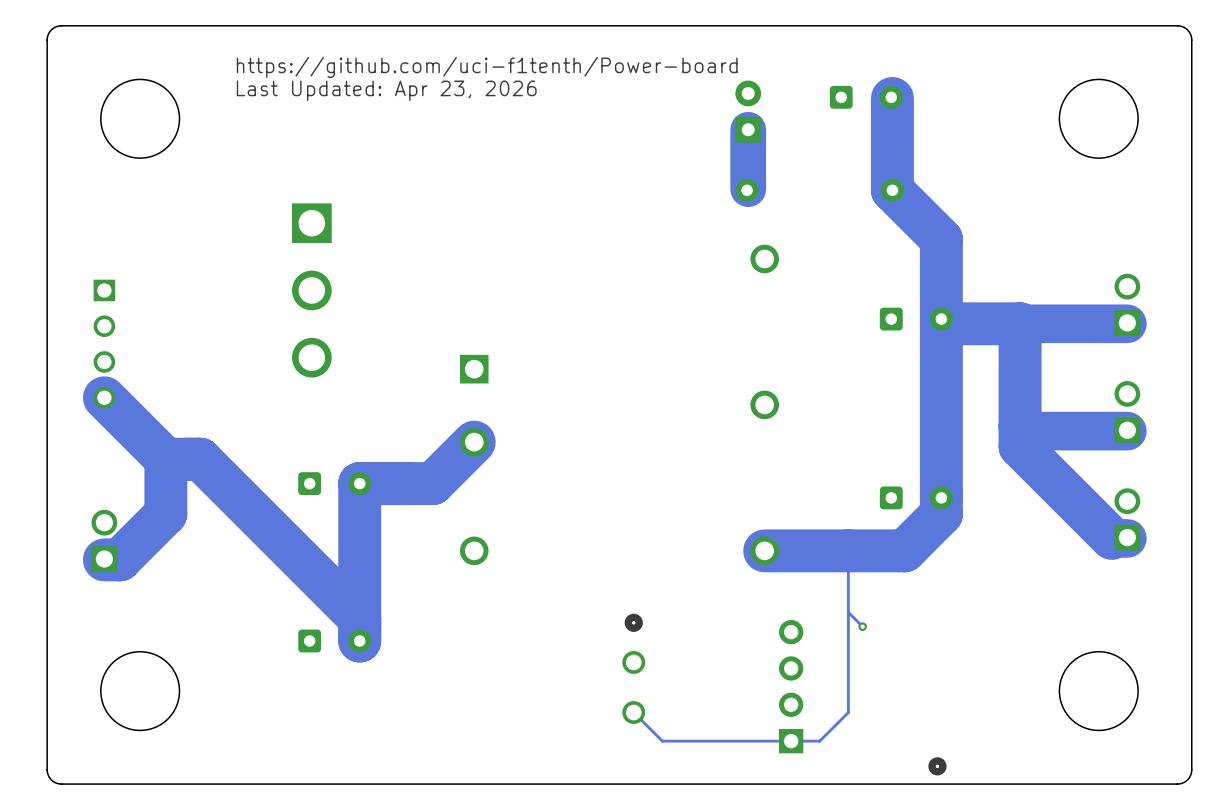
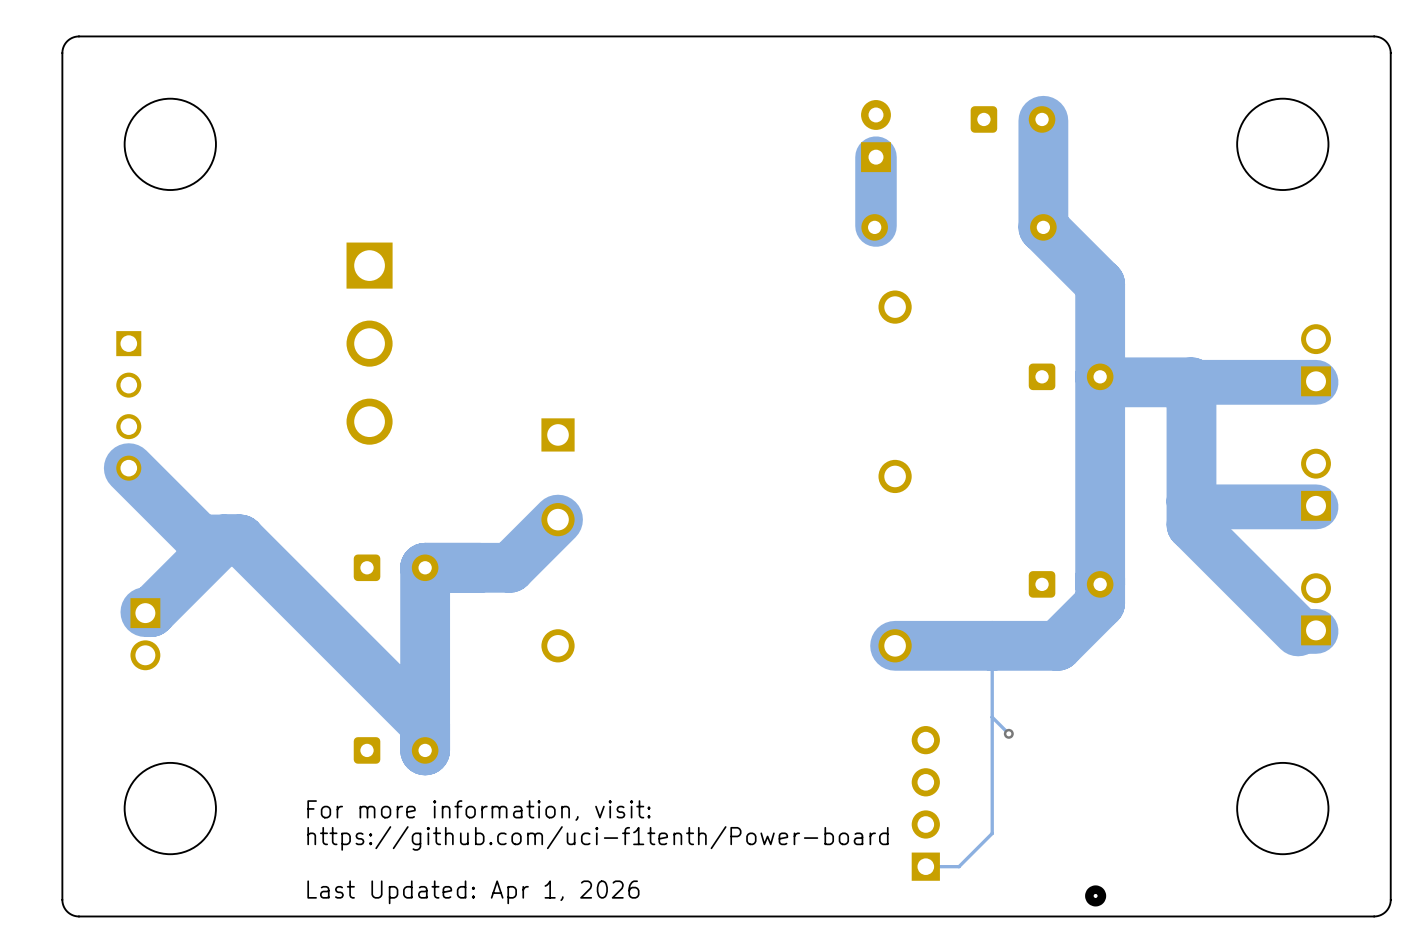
text: https://github.com/uci-f1tenth/Power-board (487, 67) -> none
text: Last Updated: Apr 23, 2026 (386, 90) -> none
track: (165, 459) (165, 513) (119, 559) (104, 559) -> none
track: none -> (223, 539) (150, 612) (145, 612)
part rotation: 0° (104, 540) -> 180° (145, 634)
part: (633, 668) -> none
text: none -> For more information, visit: (478, 810)
track: (633, 712) (662, 741) (791, 741) -> none
text: none -> https://github.com/uci-f1tenth/Power-board (597, 838)
text: none -> Last Updated: Apr 1, 2026 (473, 892)

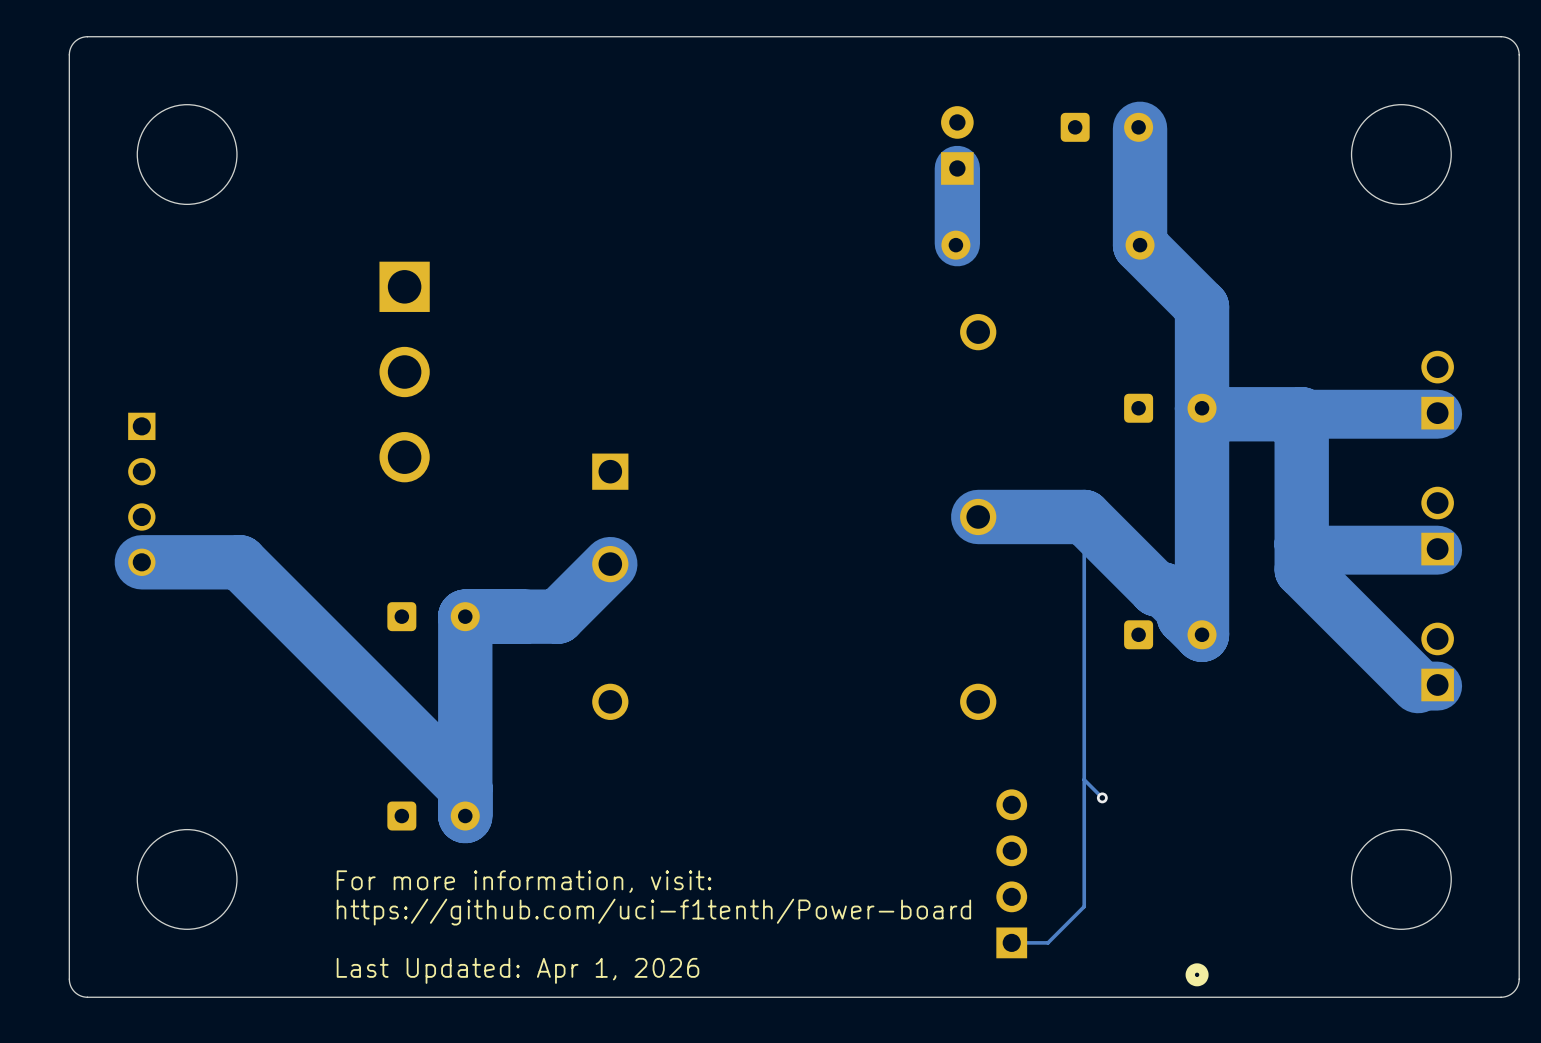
part position: (128, 405) -> (141, 494)
track: (128, 468) (200, 539) (240, 539) -> (141, 562) (239, 562) (263, 585)
track: none -> (1084, 516) (978, 516)
track: none -> (1084, 516) (1084, 701)
track: (223, 539) (150, 612) (145, 612) -> none
track: (1100, 584) (1100, 603) (1057, 645) (895, 645) -> (1202, 634) (1183, 616) (1183, 610) (1163, 589) (1156, 589) (1084, 516)
part: (145, 634) -> none

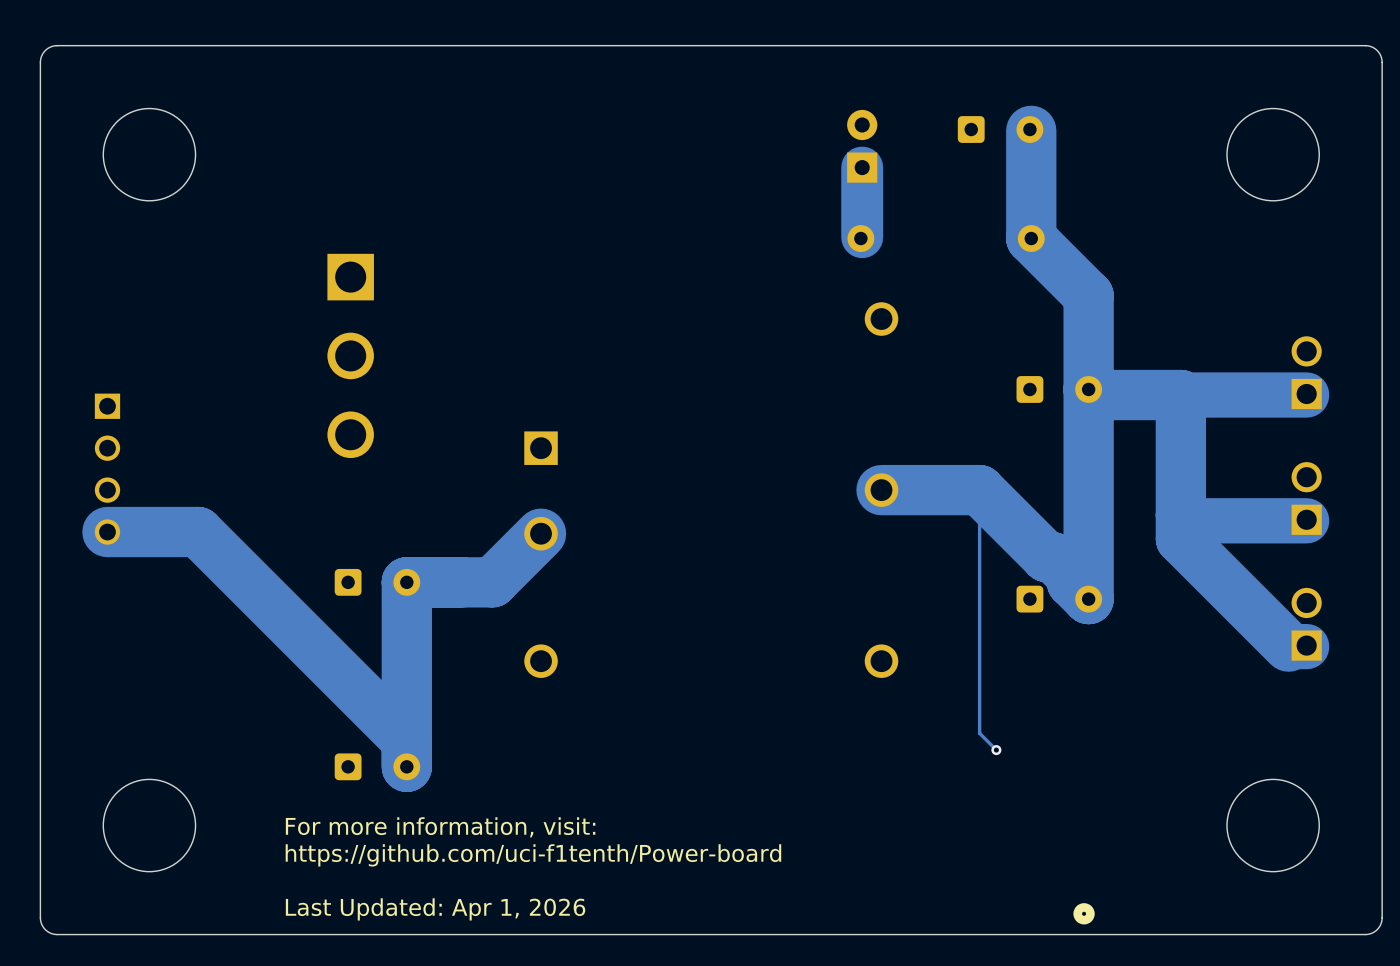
track: (1084, 779) (1084, 906) (1047, 942) (1011, 942) -> none
part: (1011, 873) -> none

